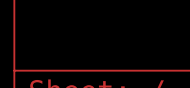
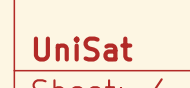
title block: none -> UniSat (83, 49)

